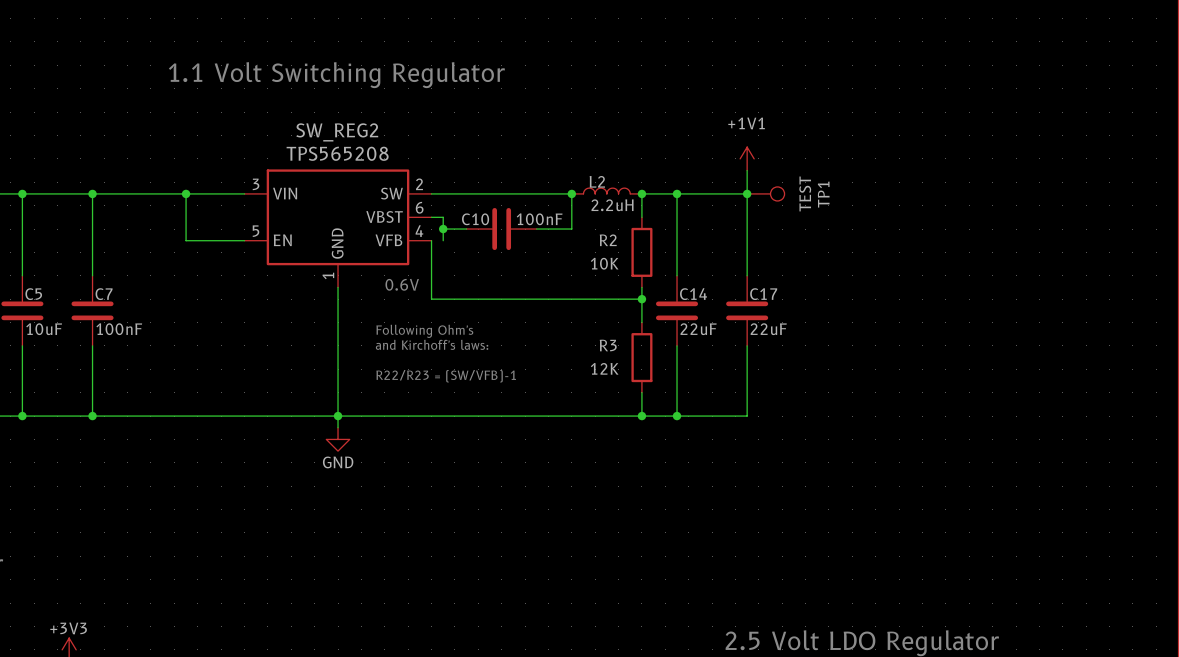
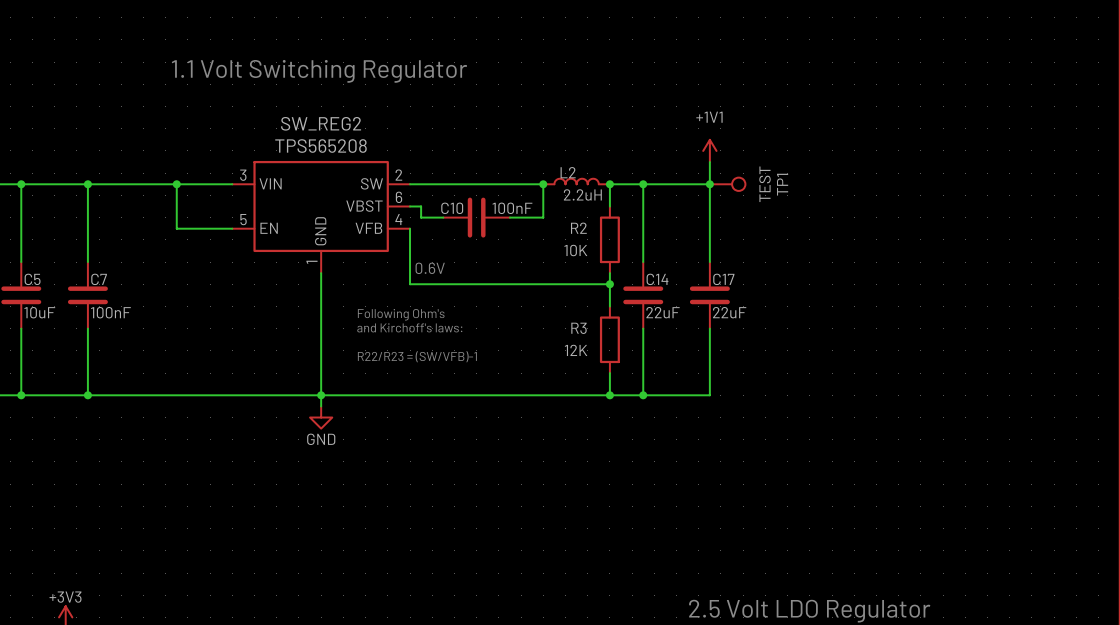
wire: (443, 229) (443, 240) -> none
junction: (443, 229) -> none
text position: 0.6V (402, 284) -> 0.6V (430, 268)

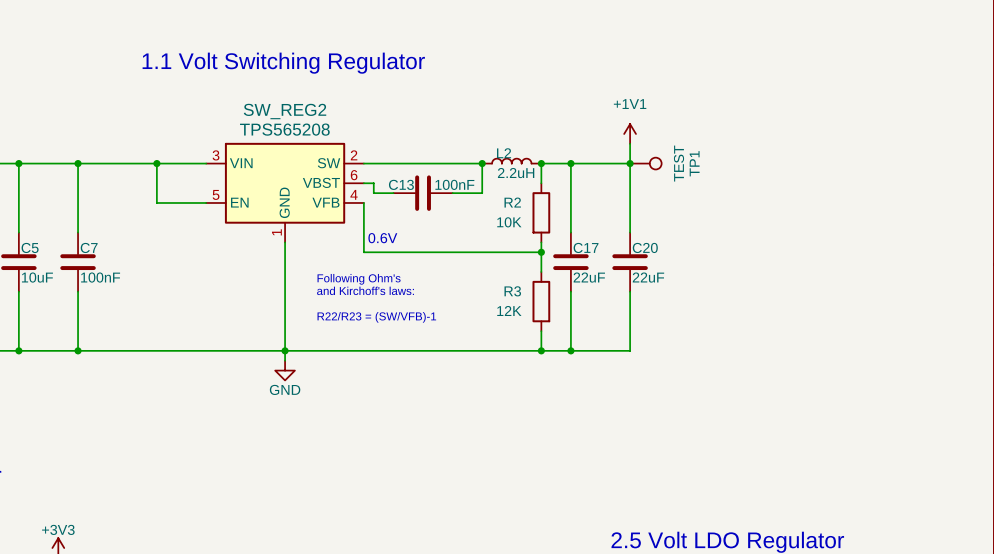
C10 name: C10 (452, 208) -> C13 (401, 184)
C14 name: C14 (657, 279) -> C17 (586, 247)
C17 name: C17 (723, 279) -> C20 (645, 247)

